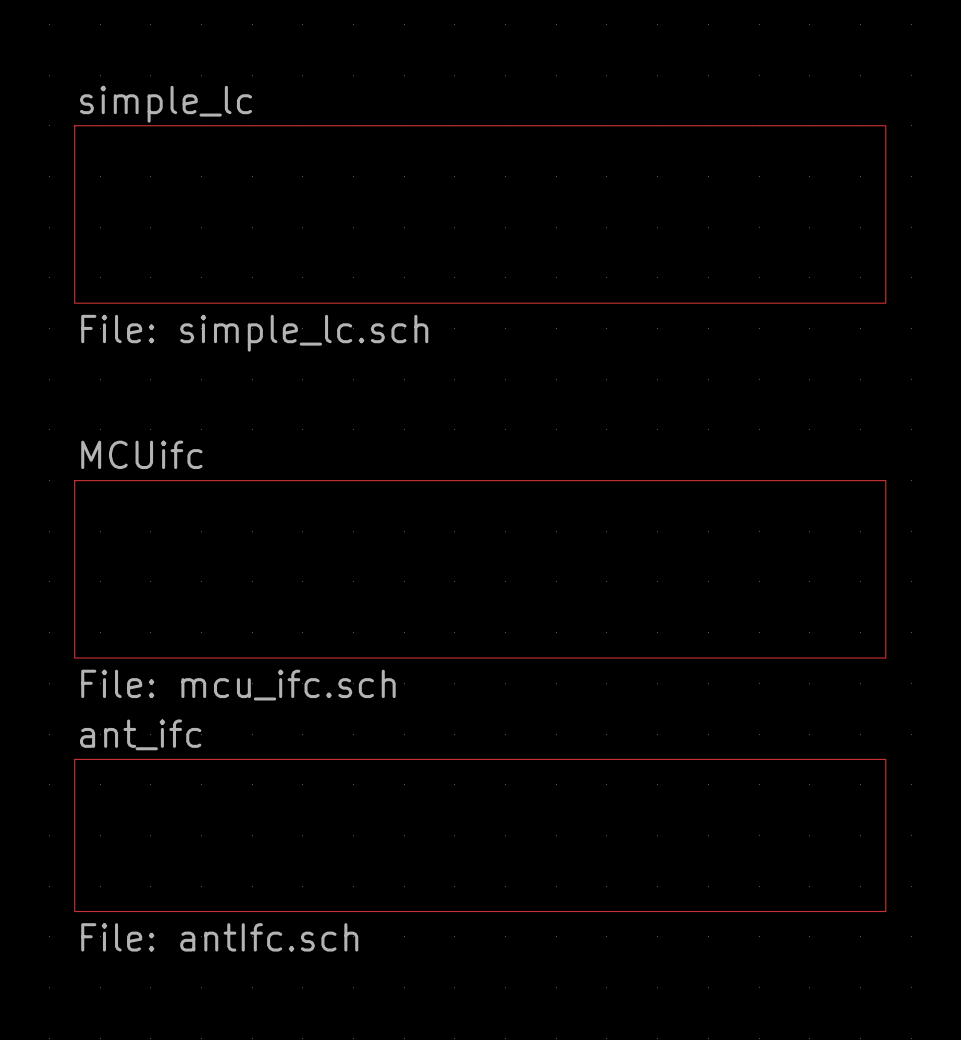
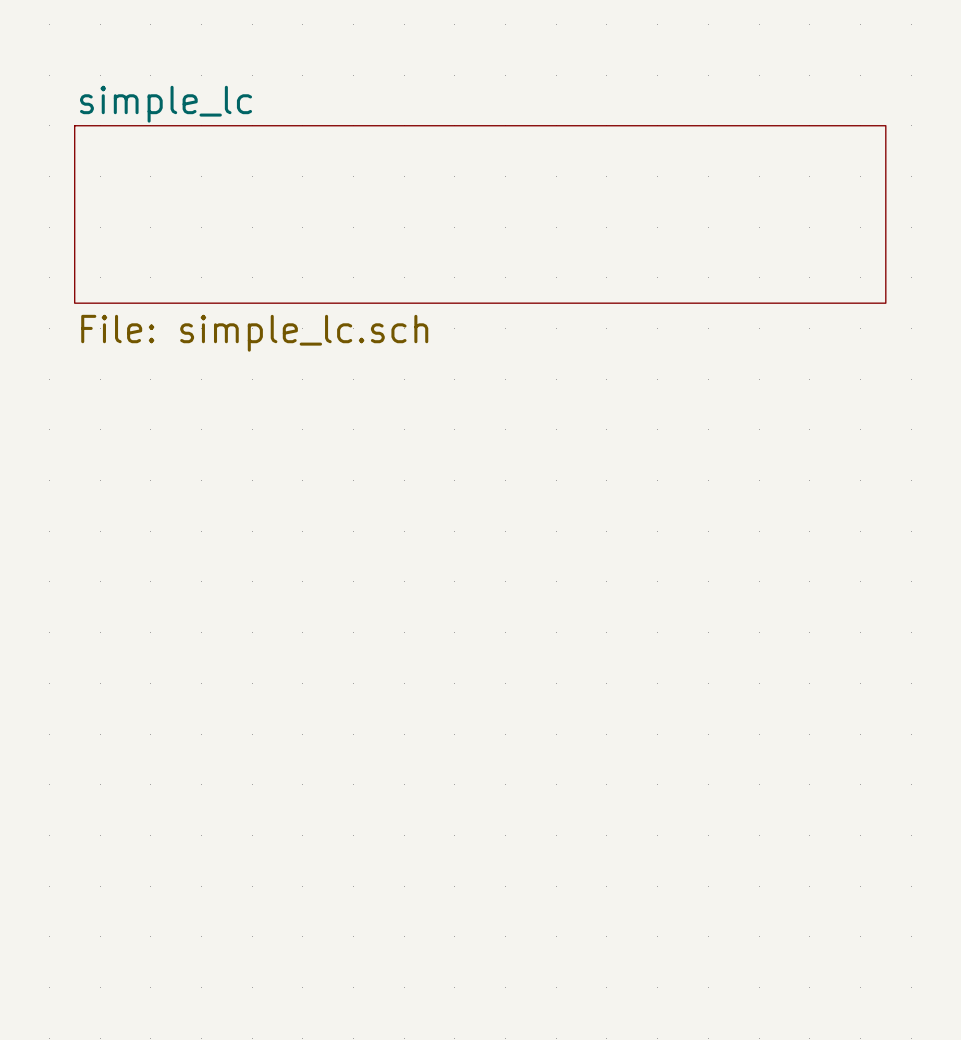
sheet MCUifc: File: mcu_ifc.sch (480, 569) -> none
sheet ant_ifc: File: antIfc.sch (480, 835) -> none

